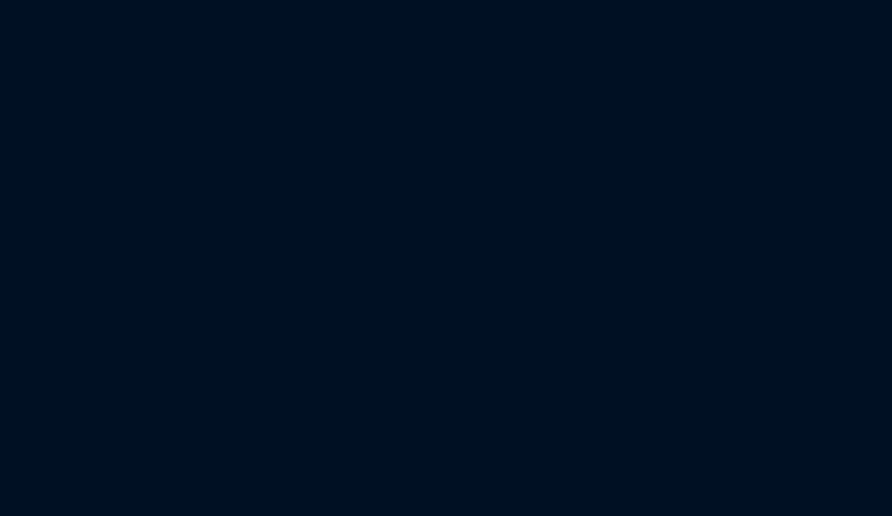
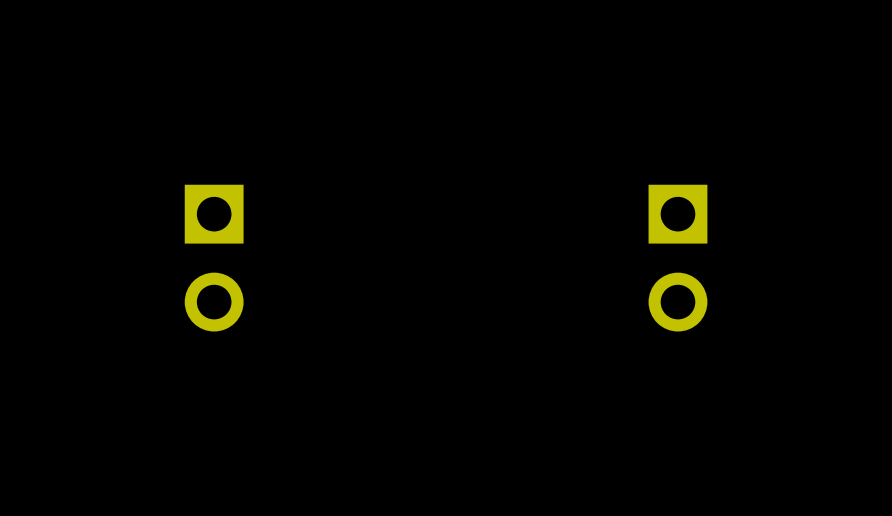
part: none -> (214, 258)
part: none -> (677, 258)

